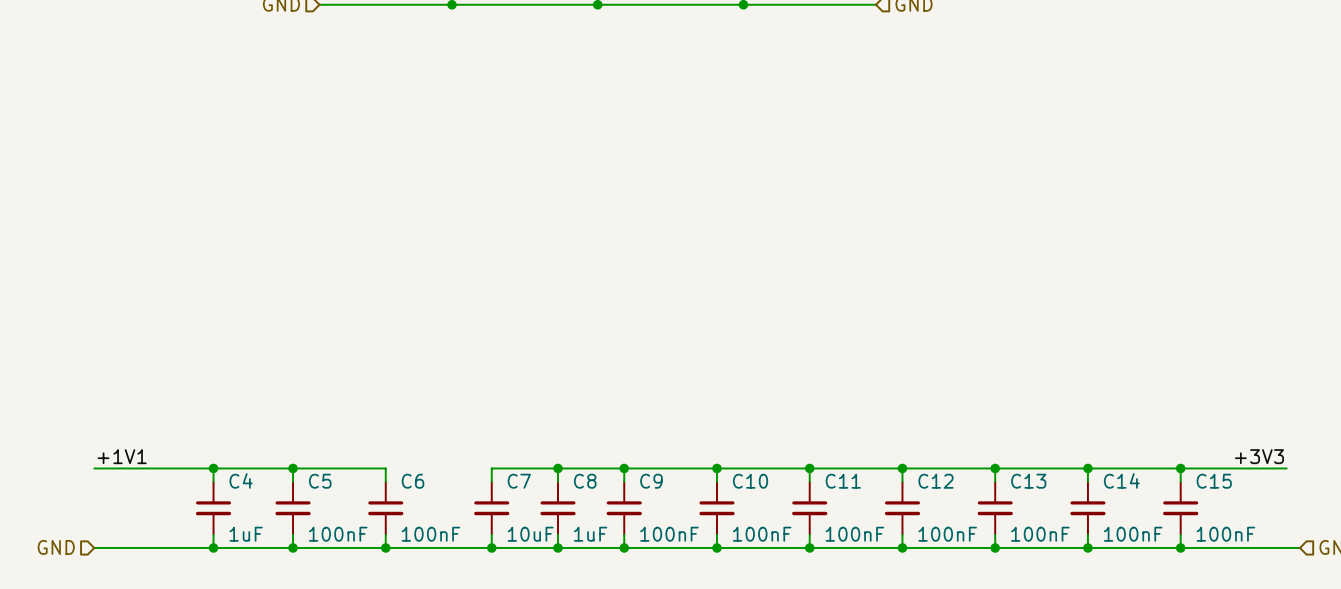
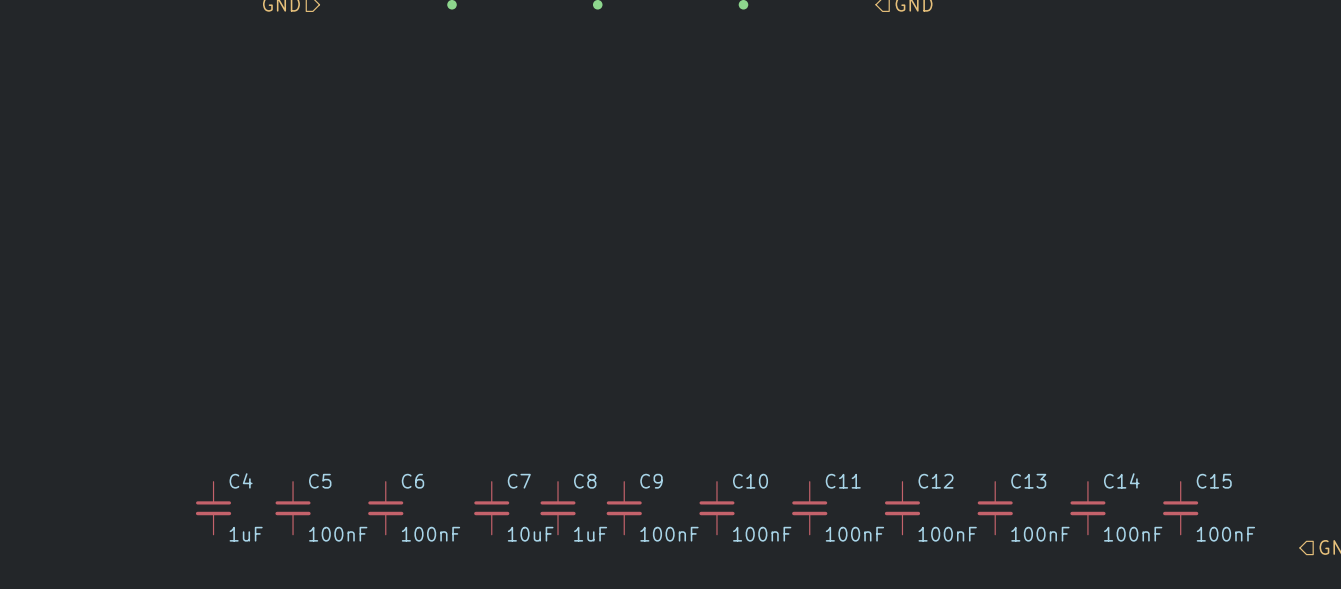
wire: (319, 4) (875, 4) -> none
label: +1V1 (122, 456) -> none
label: +3V3 (1259, 456) -> none
wire: (94, 468) (385, 468) (385, 481) -> none
wire: (213, 468) (213, 481) -> none
junction: (213, 468) -> none
wire: (293, 468) (293, 481) -> none
junction: (293, 468) -> none
wire: (558, 468) (558, 481) -> none
junction: (558, 468) -> none
wire: (624, 468) (624, 481) -> none
junction: (624, 468) -> none
wire: (716, 468) (716, 481) -> none
junction: (716, 468) -> none
wire: (809, 468) (809, 481) -> none
junction: (809, 468) -> none
wire: (902, 468) (902, 481) -> none
junction: (902, 468) -> none
wire: (995, 468) (995, 481) -> none
junction: (995, 468) -> none
wire: (1087, 468) (1087, 481) -> none
junction: (1087, 468) -> none
wire: (1180, 468) (1180, 481) -> none
junction: (1180, 468) -> none
wire: (1286, 468) (491, 468) (491, 481) -> none
wire: (213, 534) (213, 547) -> none
wire: (293, 534) (293, 547) -> none
wire: (385, 534) (385, 547) -> none
wire: (491, 534) (491, 547) -> none
wire: (558, 534) (558, 547) -> none
wire: (624, 534) (624, 547) -> none
wire: (716, 534) (716, 547) -> none
wire: (809, 534) (809, 547) -> none
wire: (902, 534) (902, 547) -> none
wire: (995, 534) (995, 547) -> none
wire: (1087, 534) (1087, 547) -> none
wire: (1180, 534) (1180, 547) -> none
hierarchical label: GND (56, 547) -> none
wire: (94, 547) (1299, 547) -> none
junction: (213, 547) -> none
junction: (293, 547) -> none
junction: (385, 547) -> none
junction: (491, 547) -> none
junction: (558, 547) -> none
junction: (624, 547) -> none
junction: (716, 547) -> none
junction: (809, 547) -> none
junction: (902, 547) -> none
junction: (995, 547) -> none
junction: (1087, 547) -> none
junction: (1180, 547) -> none

